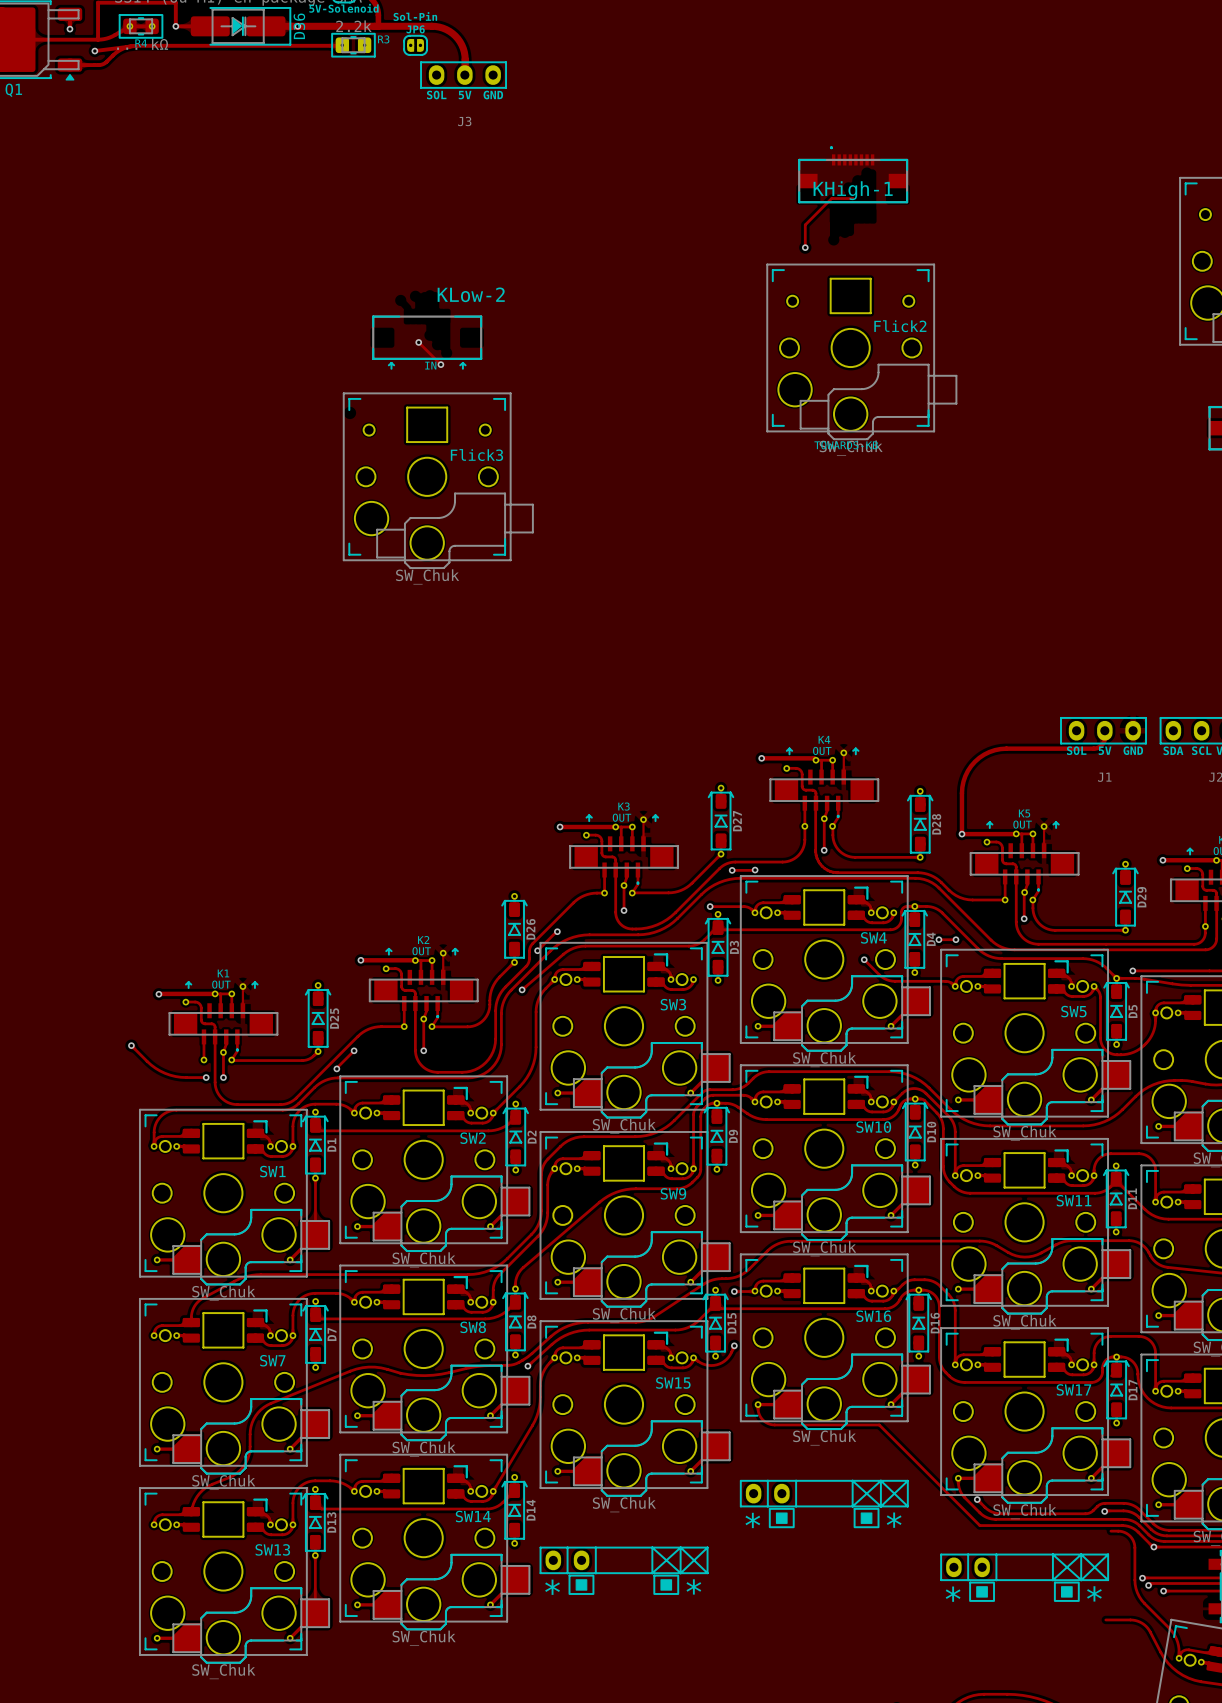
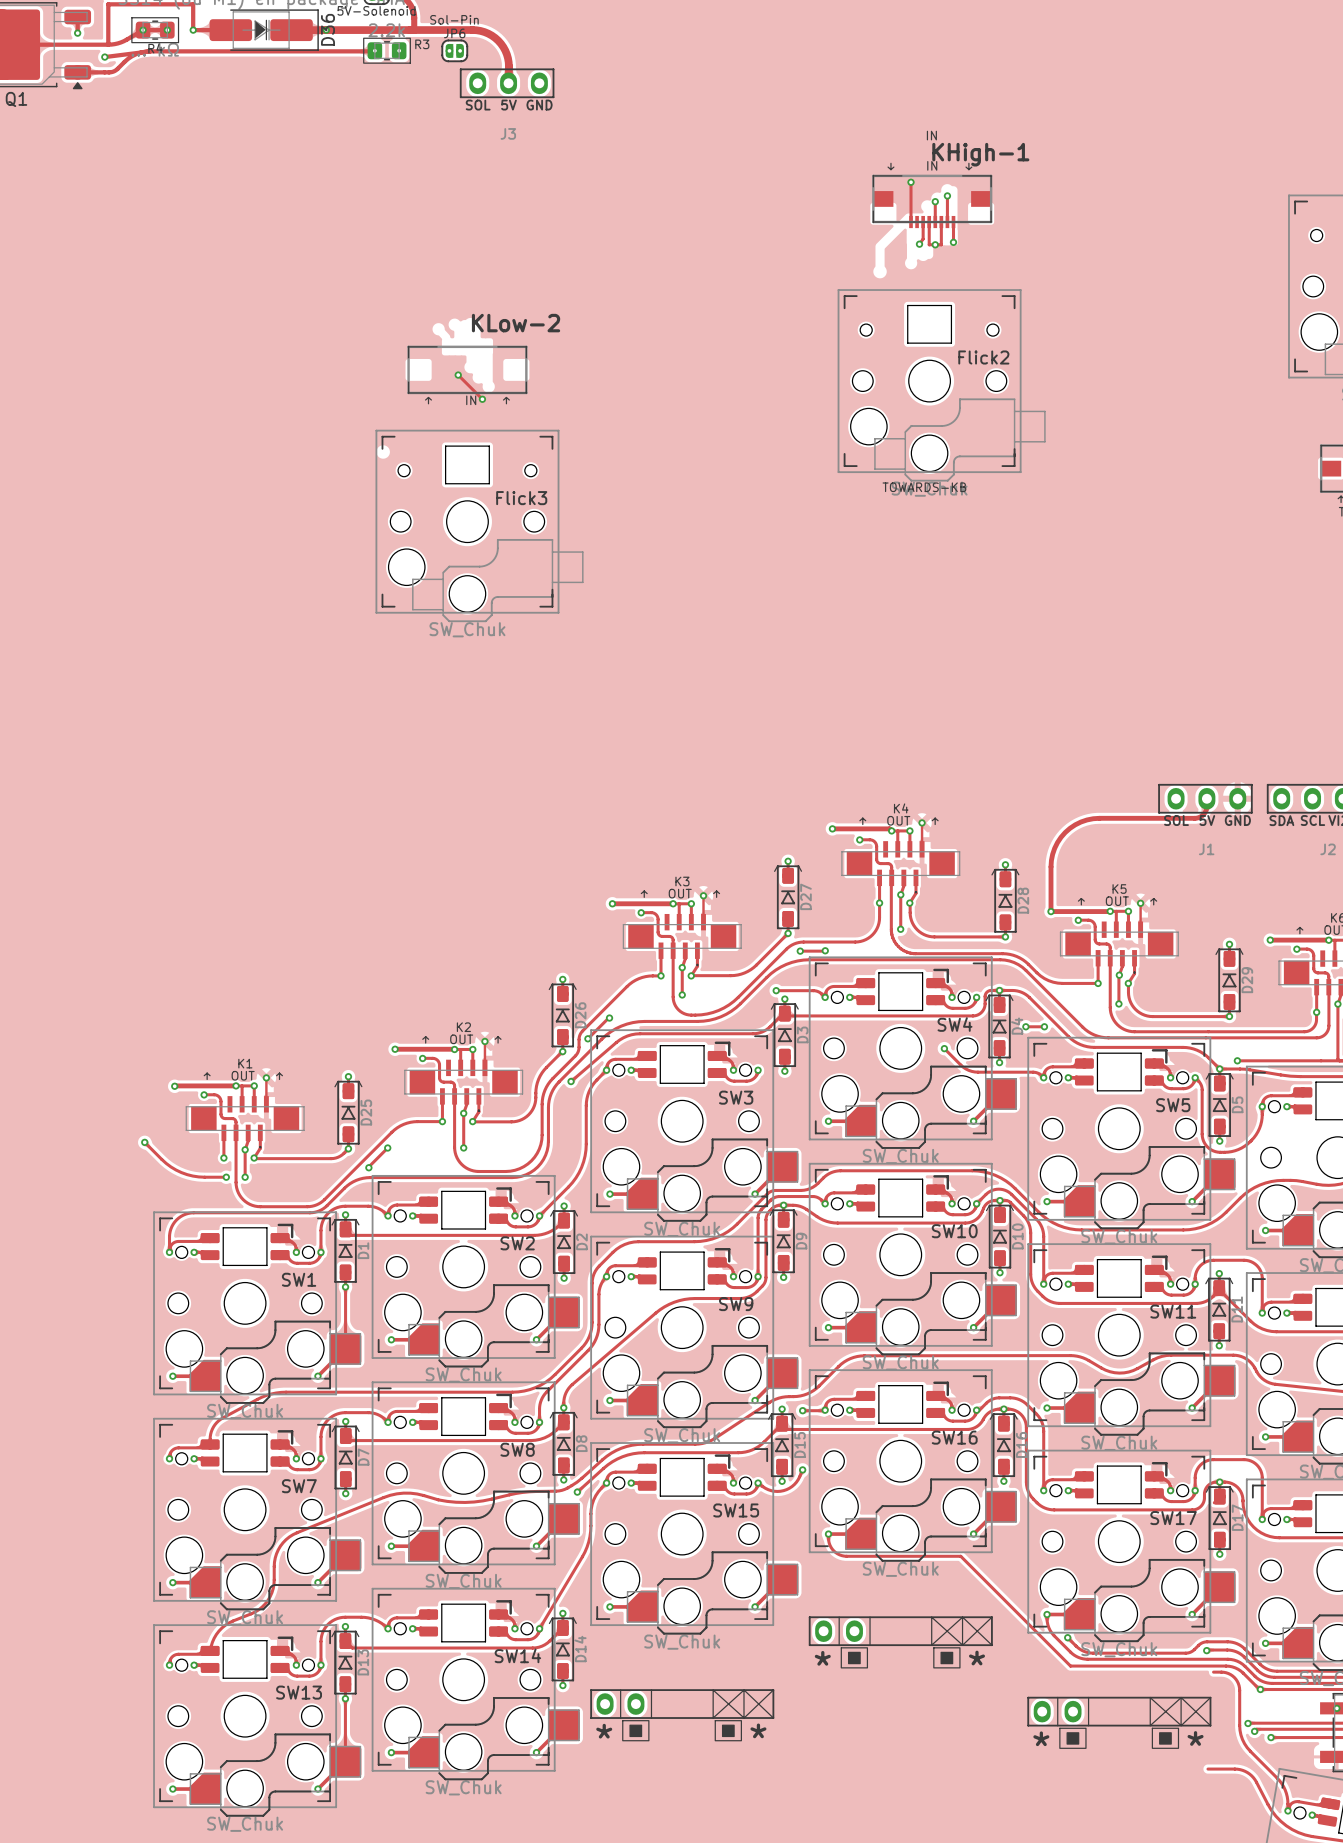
KHigh-1 footprint: [798, 146, 909, 204] -> [872, 162, 993, 249]
KHigh-1 name position: KHigh-1 (853, 190) -> KHigh-1 (980, 154)
track: (853, 198) (831, 198) (805, 224) (805, 247) -> none
via: (805, 247) -> none

